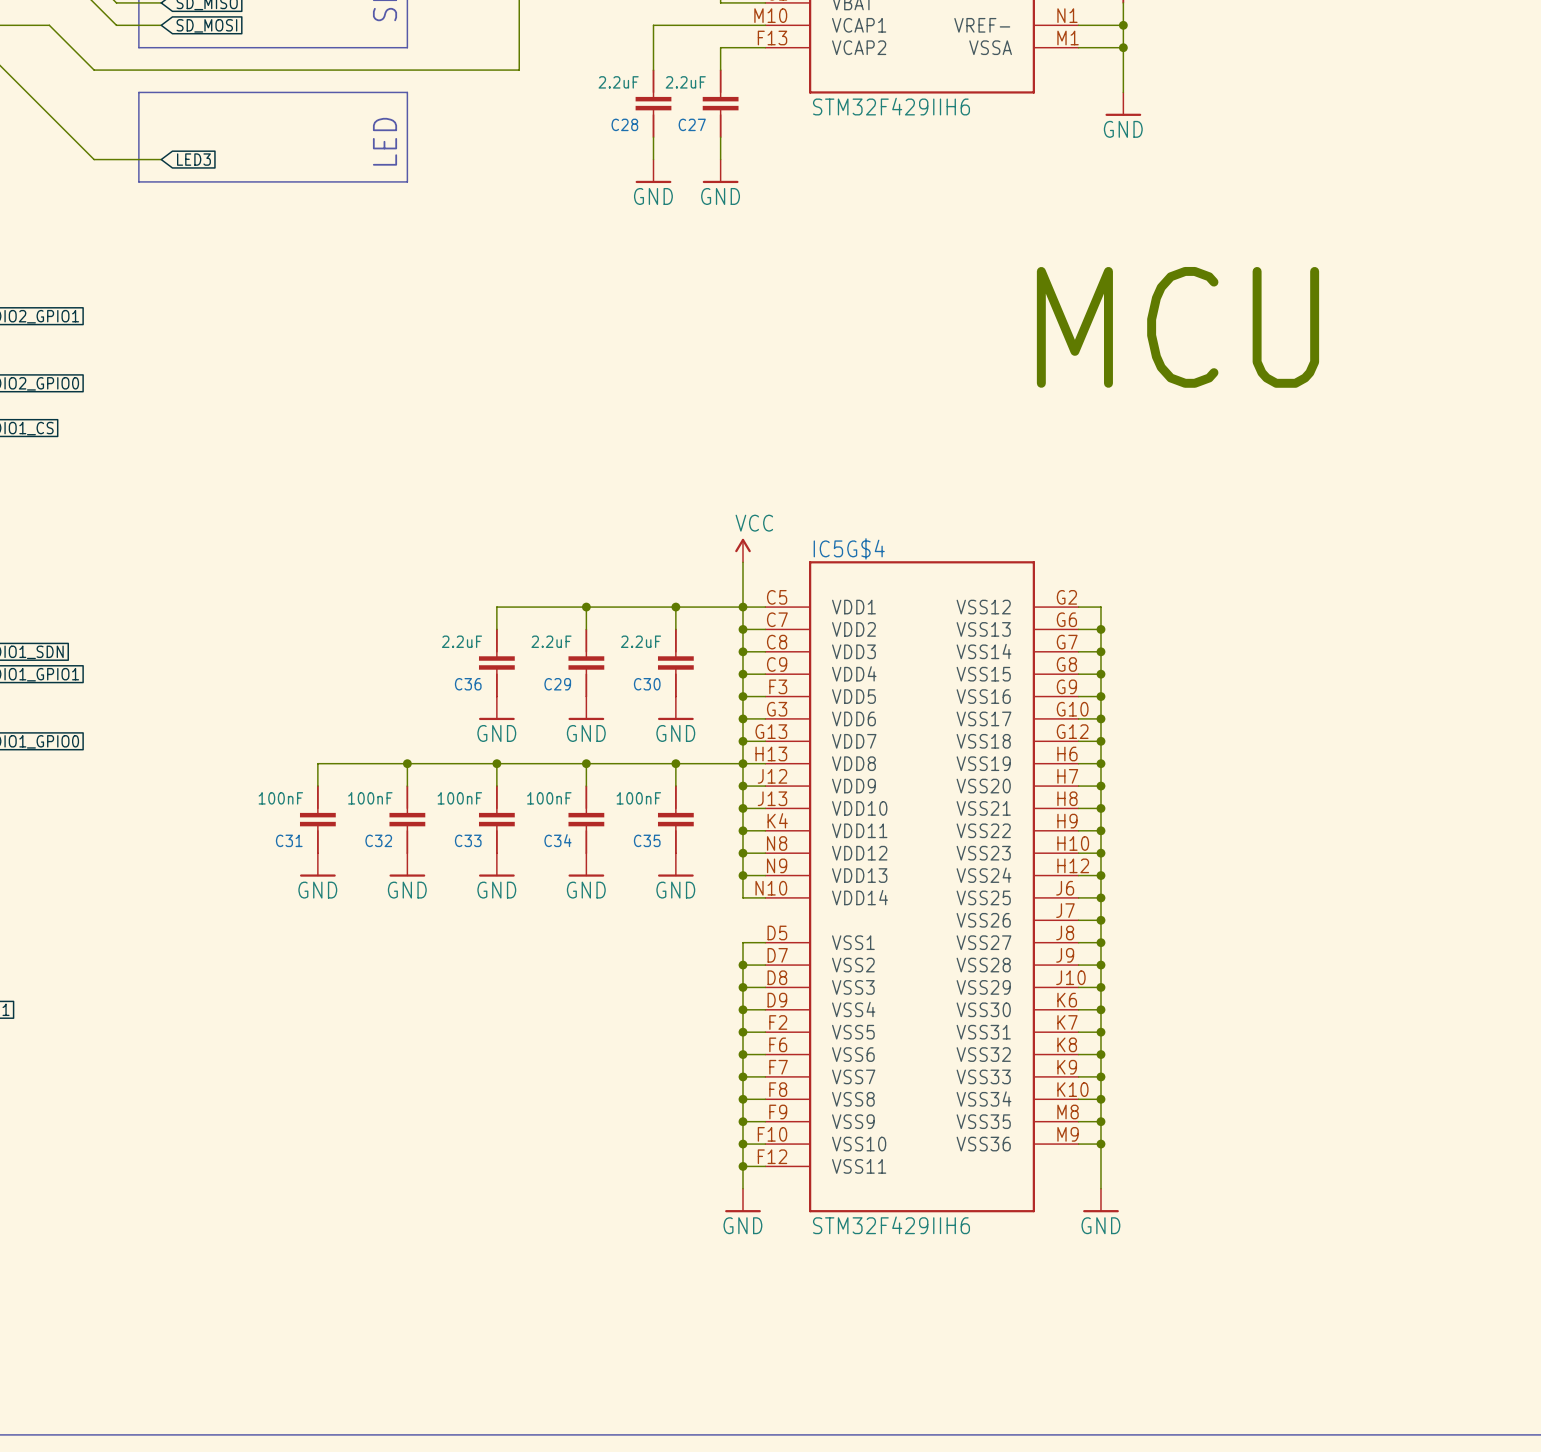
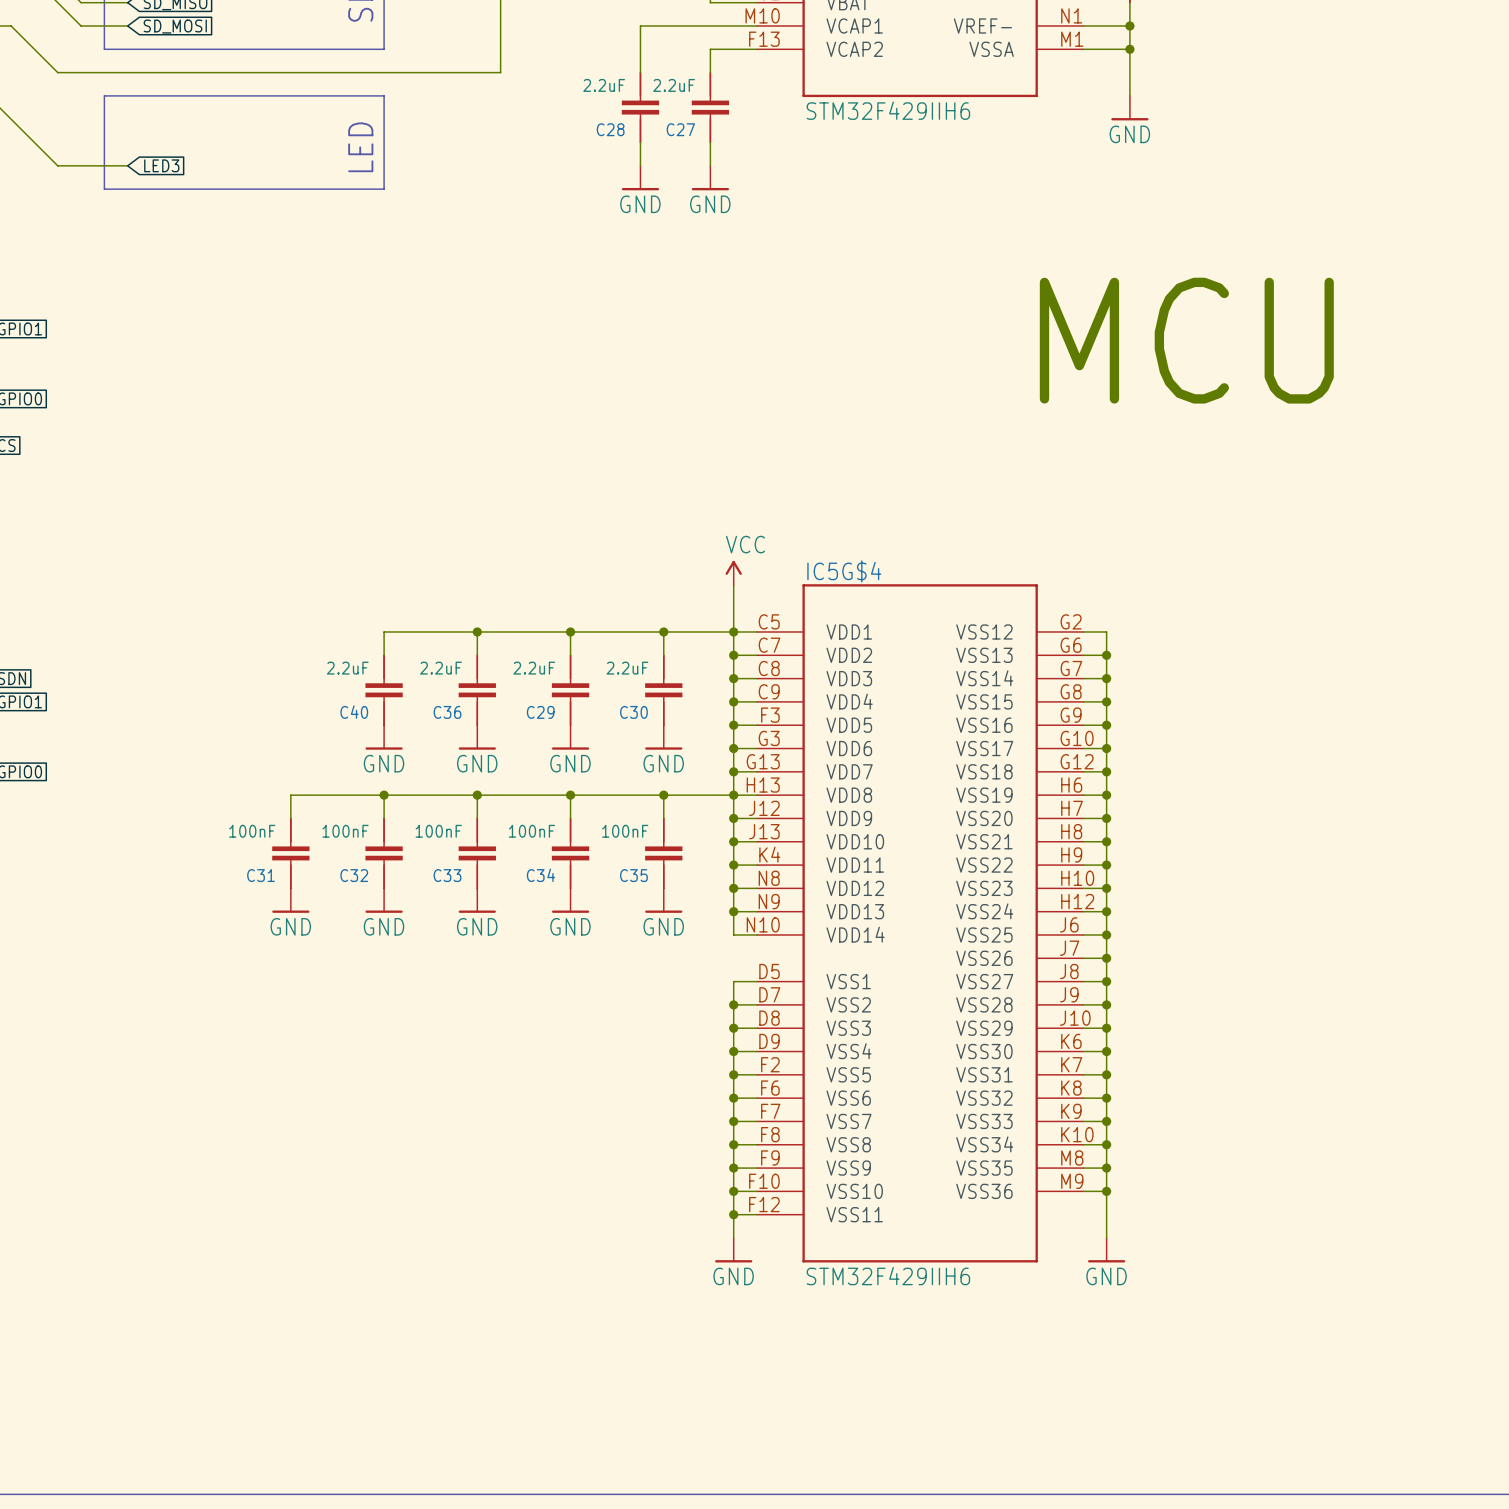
wire: none -> (477, 631) (384, 631) (384, 655)
junction: none -> (477, 631)
C40: none -> 2.2uF (384, 690)
power symbol: none -> GND (384, 737)

